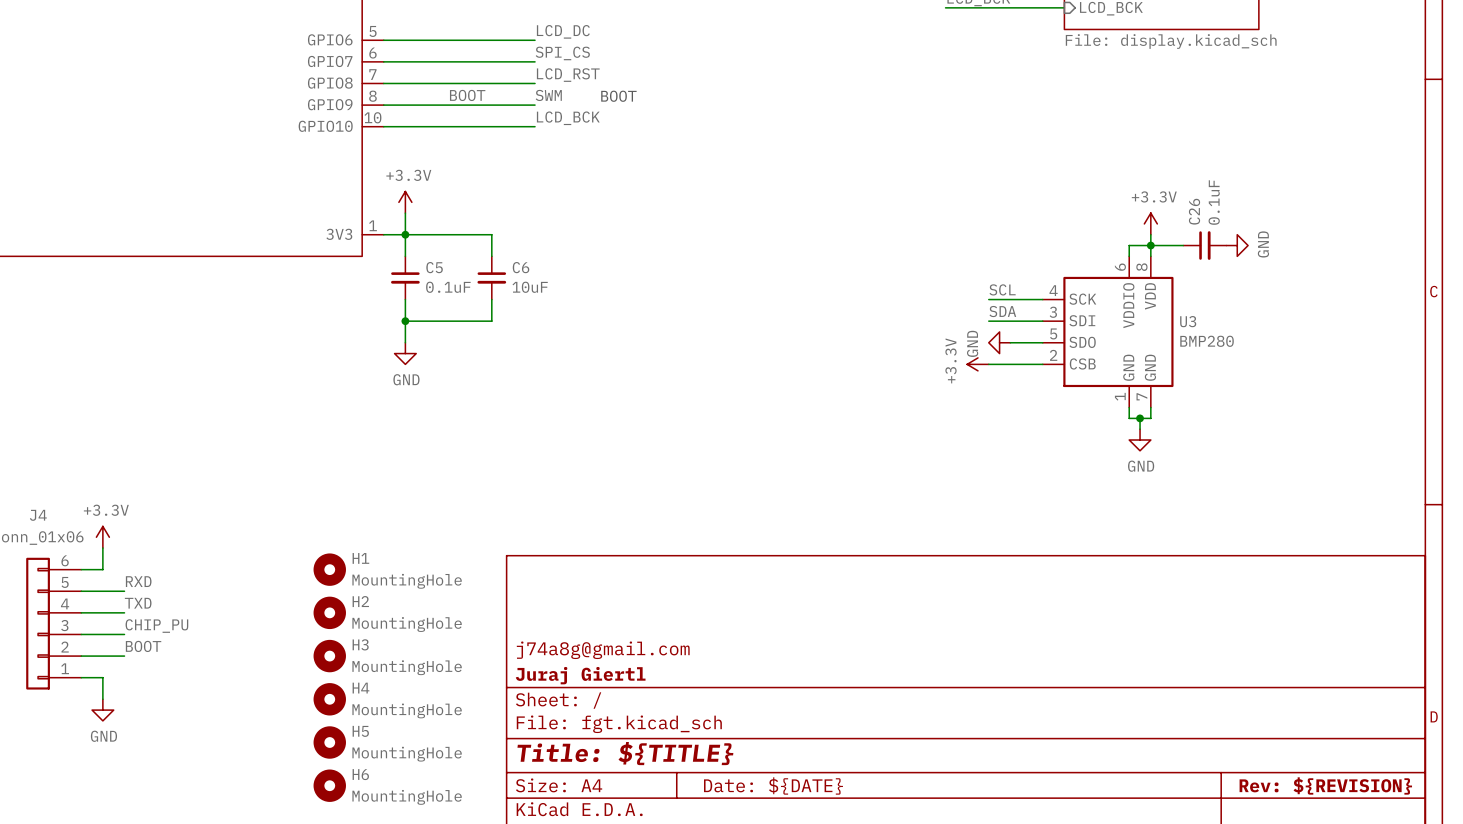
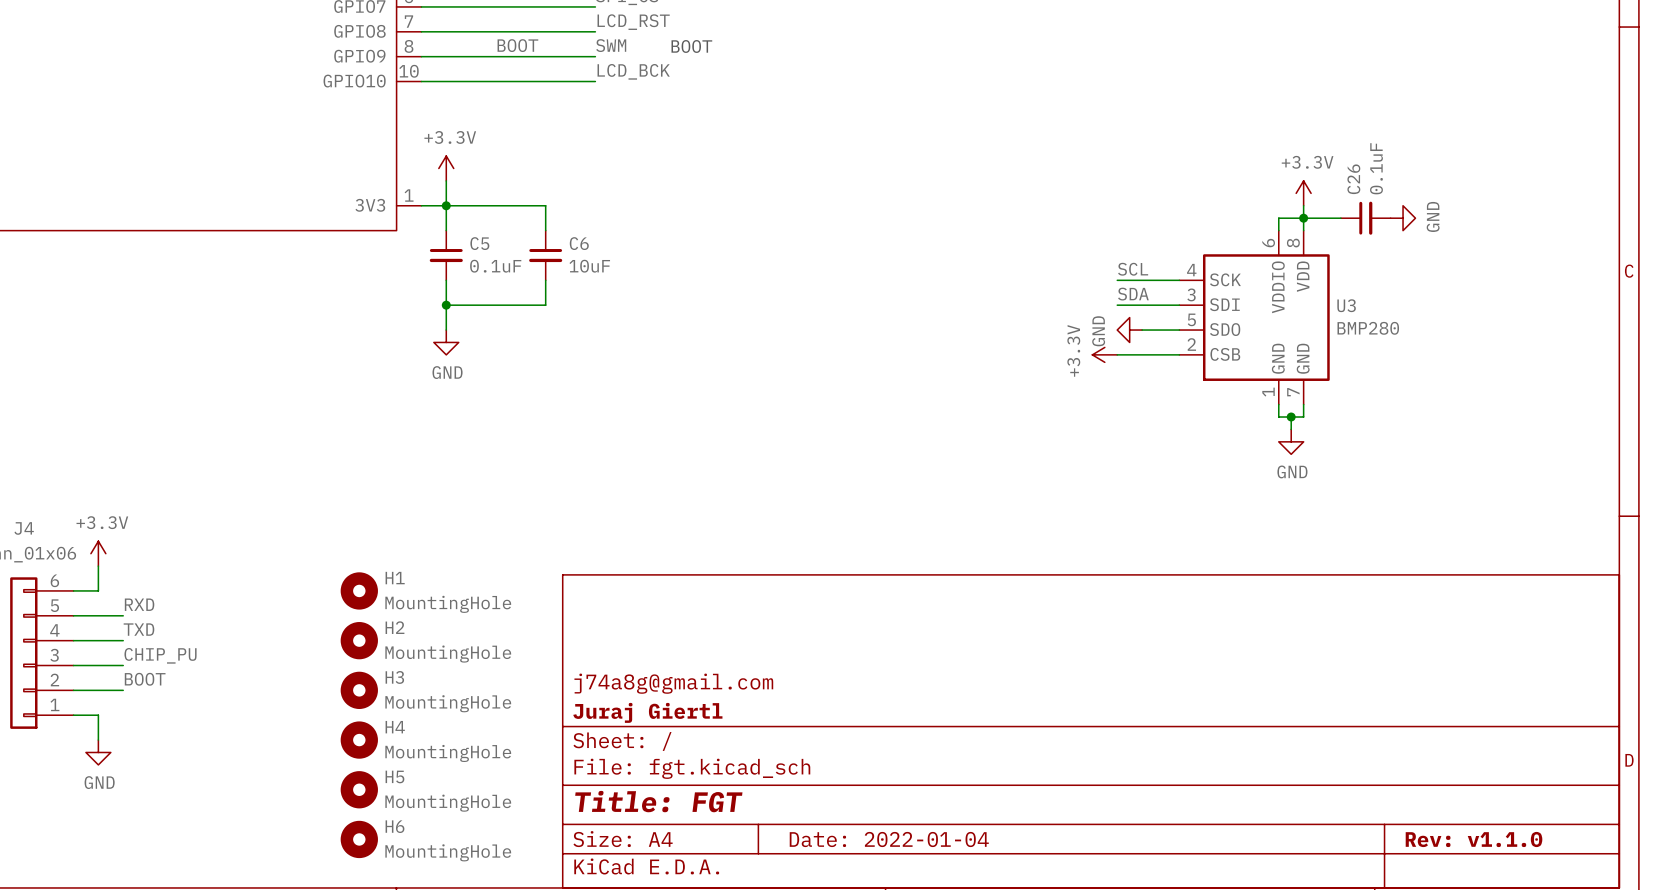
title block: Title: ${TITLE} (625, 753) -> Title: FGT (658, 801)
title block: Date: ${DATE} (773, 785) -> Date: 2022-01-04 (889, 839)
title block: Rev: ${REVISION} (1325, 785) -> Rev: v1.1.0 (1474, 839)

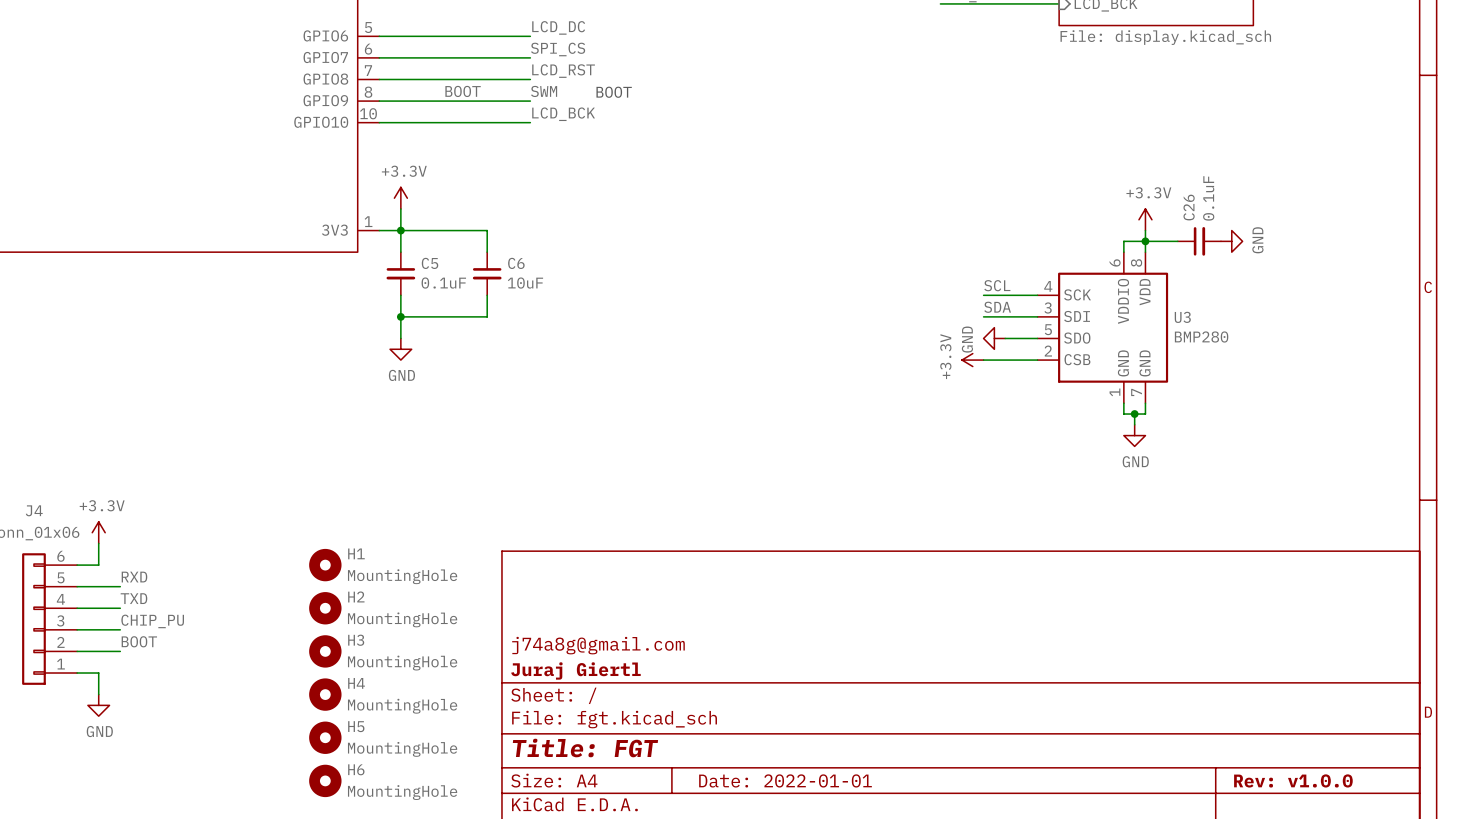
title block: Date: 2022-01-04 (889, 839) -> Date: 2022-01-01 (785, 780)
title block: Rev: v1.1.0 (1474, 839) -> Rev: v1.0.0 (1293, 780)

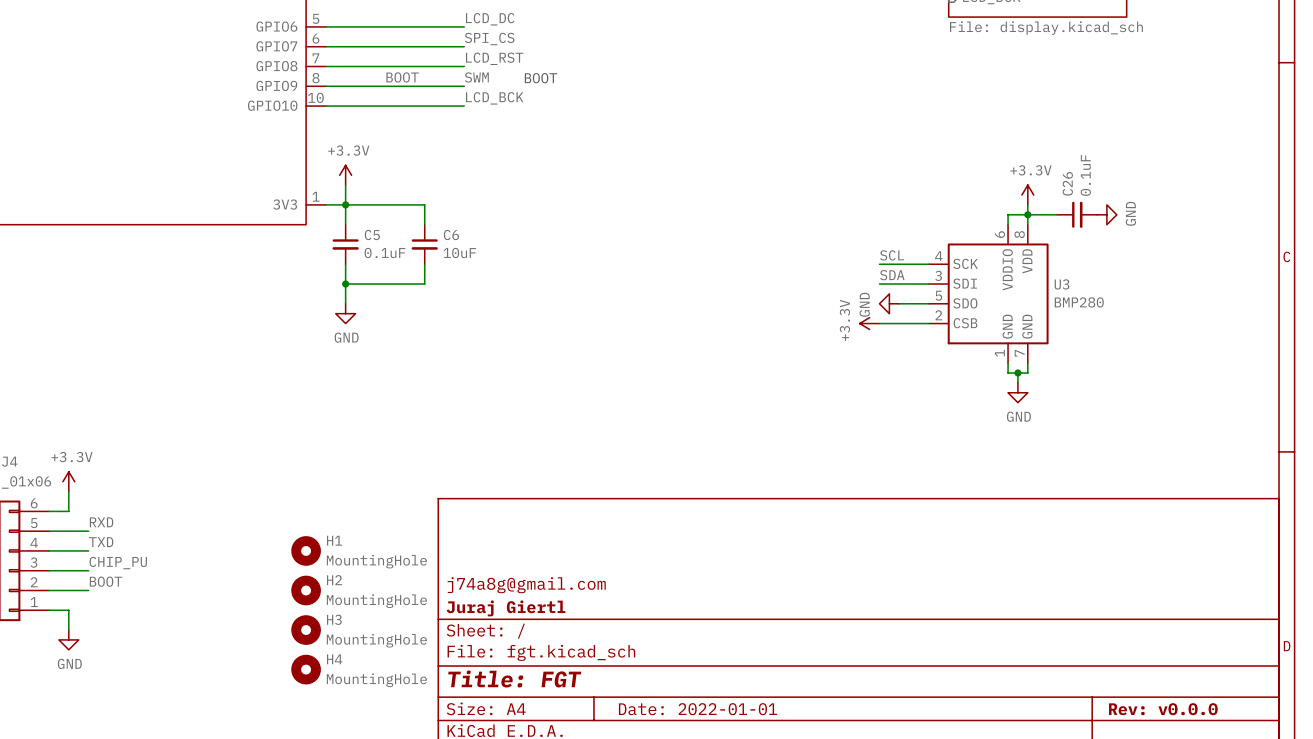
H1 position: (325, 565) -> (306, 550)
H2 position: (325, 608) -> (306, 590)
H3 position: (325, 651) -> (306, 630)
H4 position: (325, 694) -> (306, 669)
H5: MountingHole (325, 737) -> none
H6: MountingHole (325, 780) -> none
title block: Rev: v1.0.0 (1293, 780) -> Rev: v0.0.0 (1163, 709)

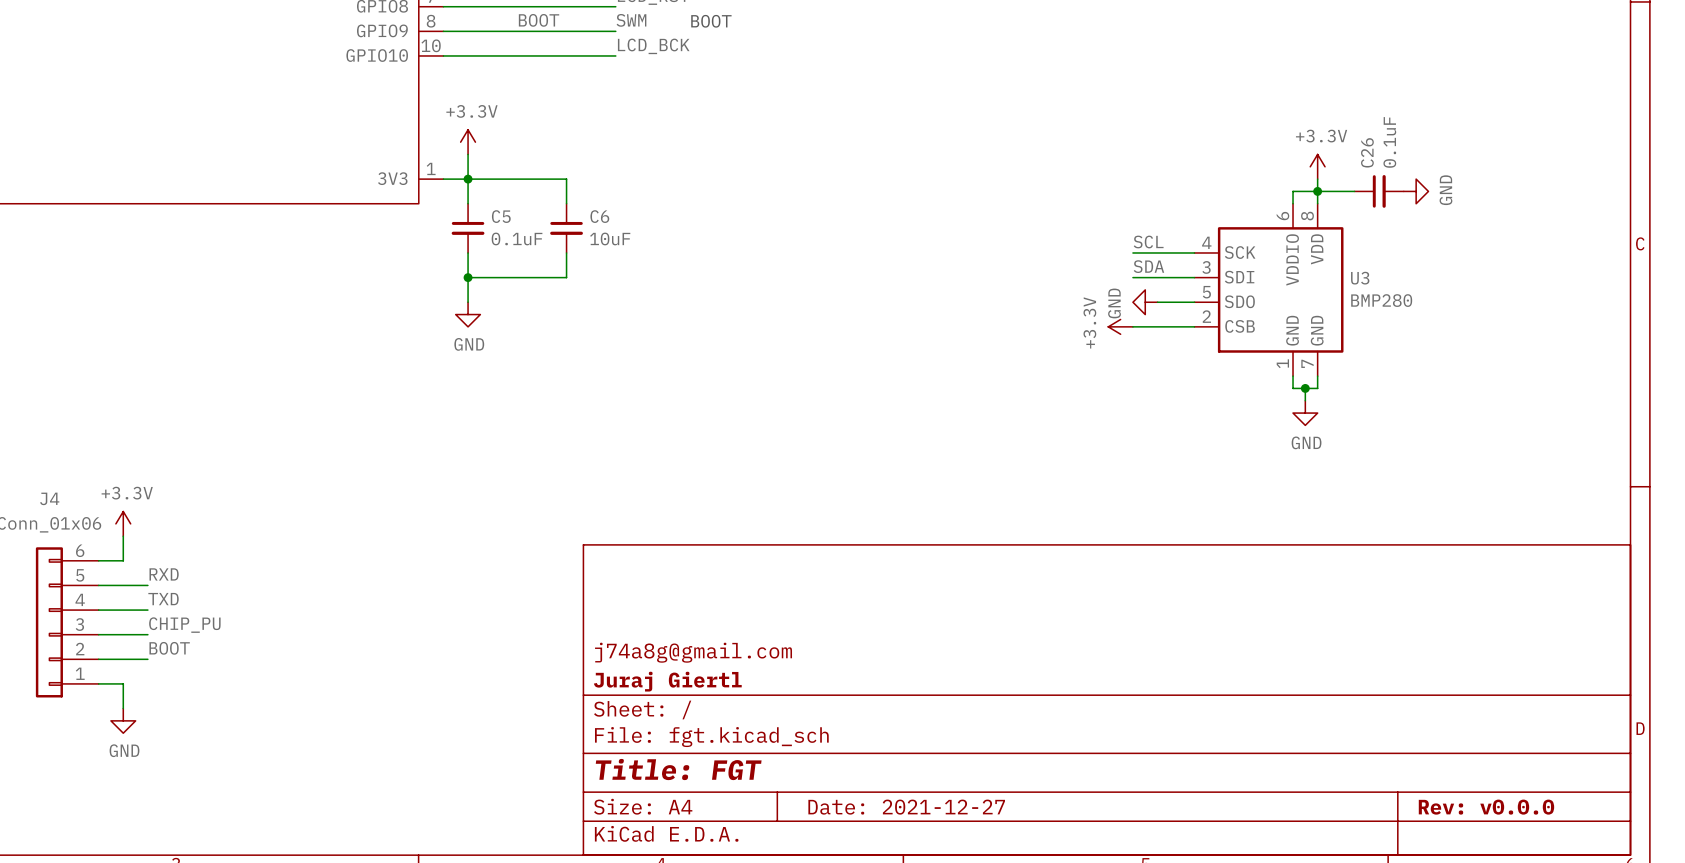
H1: MountingHole (306, 550) -> none
H2: MountingHole (306, 590) -> none
H3: MountingHole (306, 630) -> none
H4: MountingHole (306, 669) -> none
title block: Date: 2022-01-01 (698, 709) -> Date: 2021-12-27 (906, 807)

